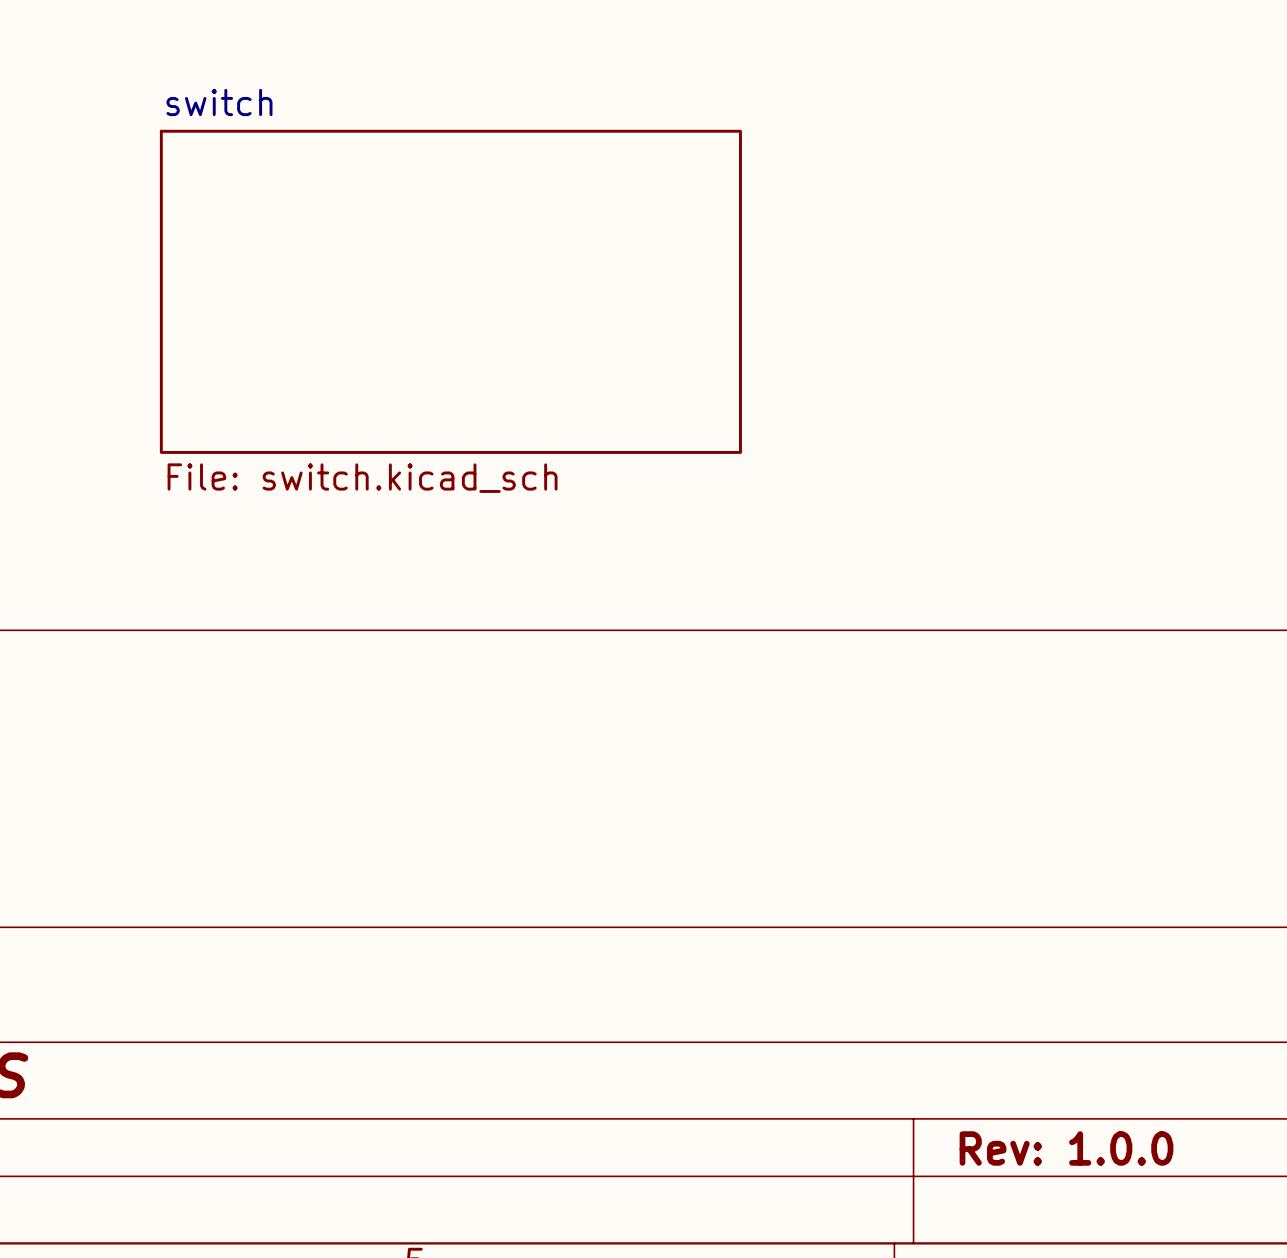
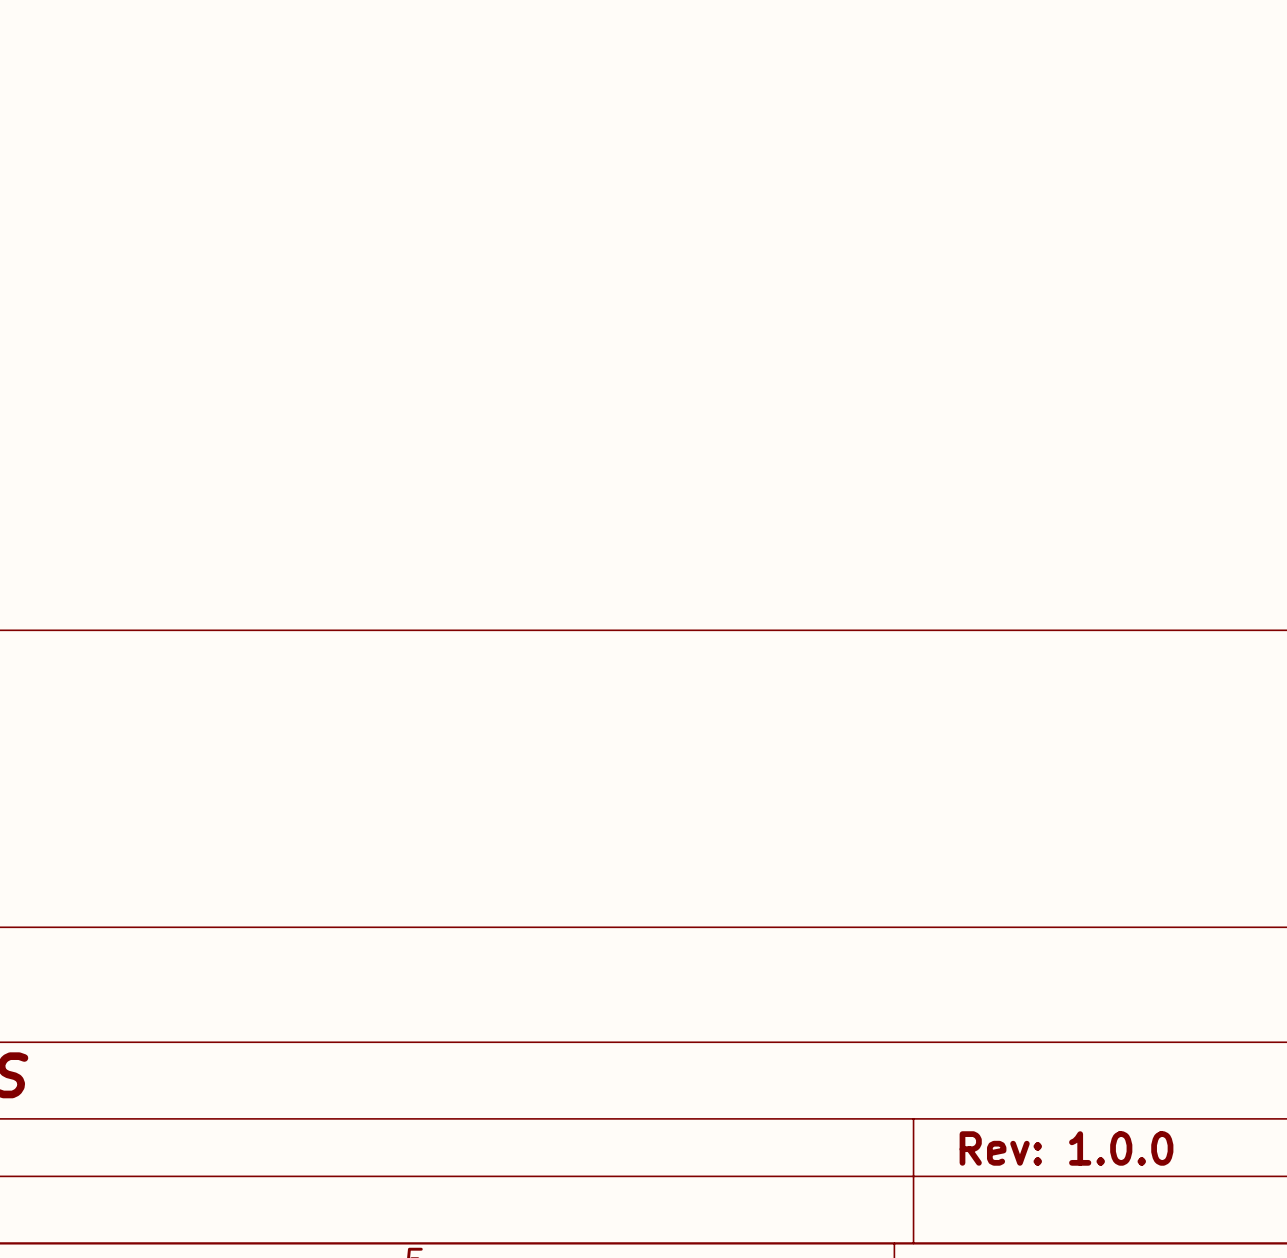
sheet switch: File: switch.kicad_sch (450, 291) -> none

